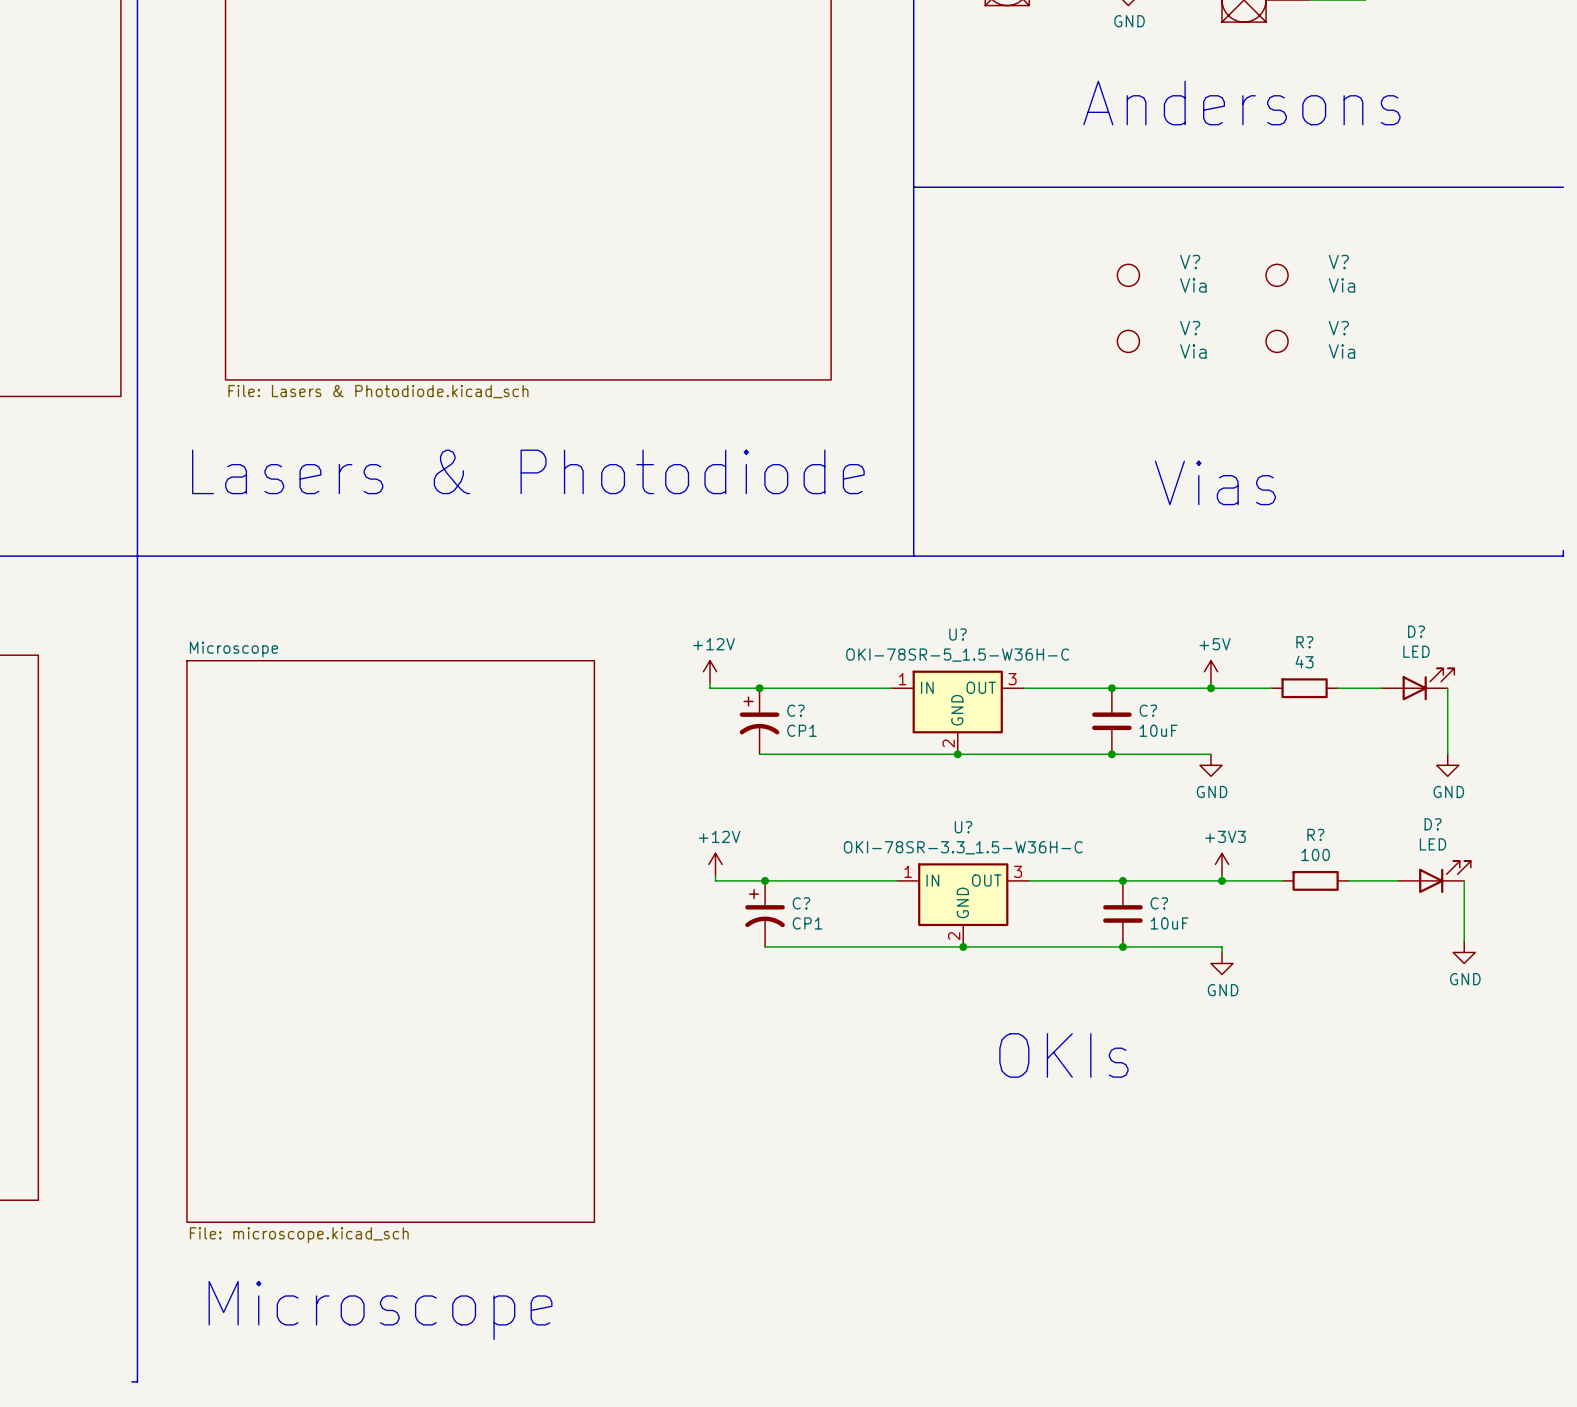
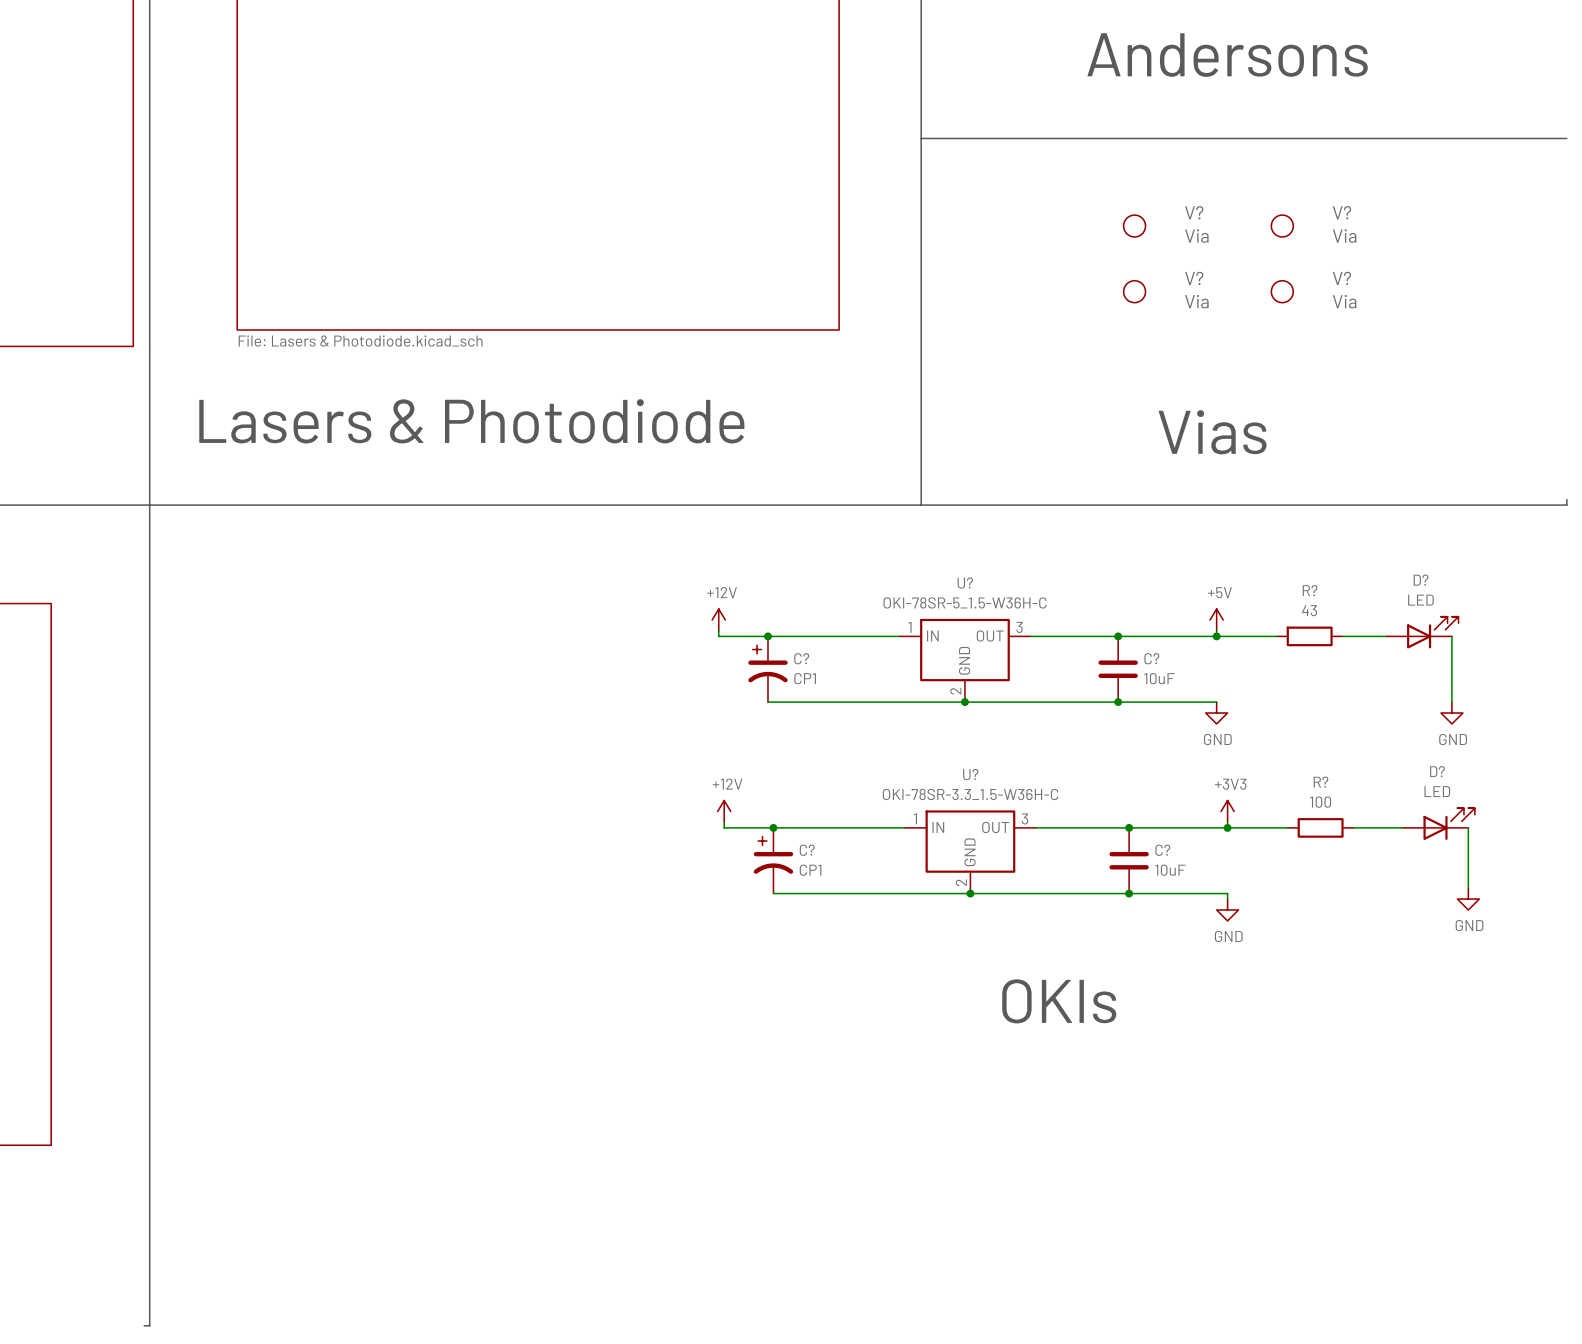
sheet Microscope: File: microscope.kicad_sch (390, 941) -> none
text: Microscope (380, 1310) -> none

